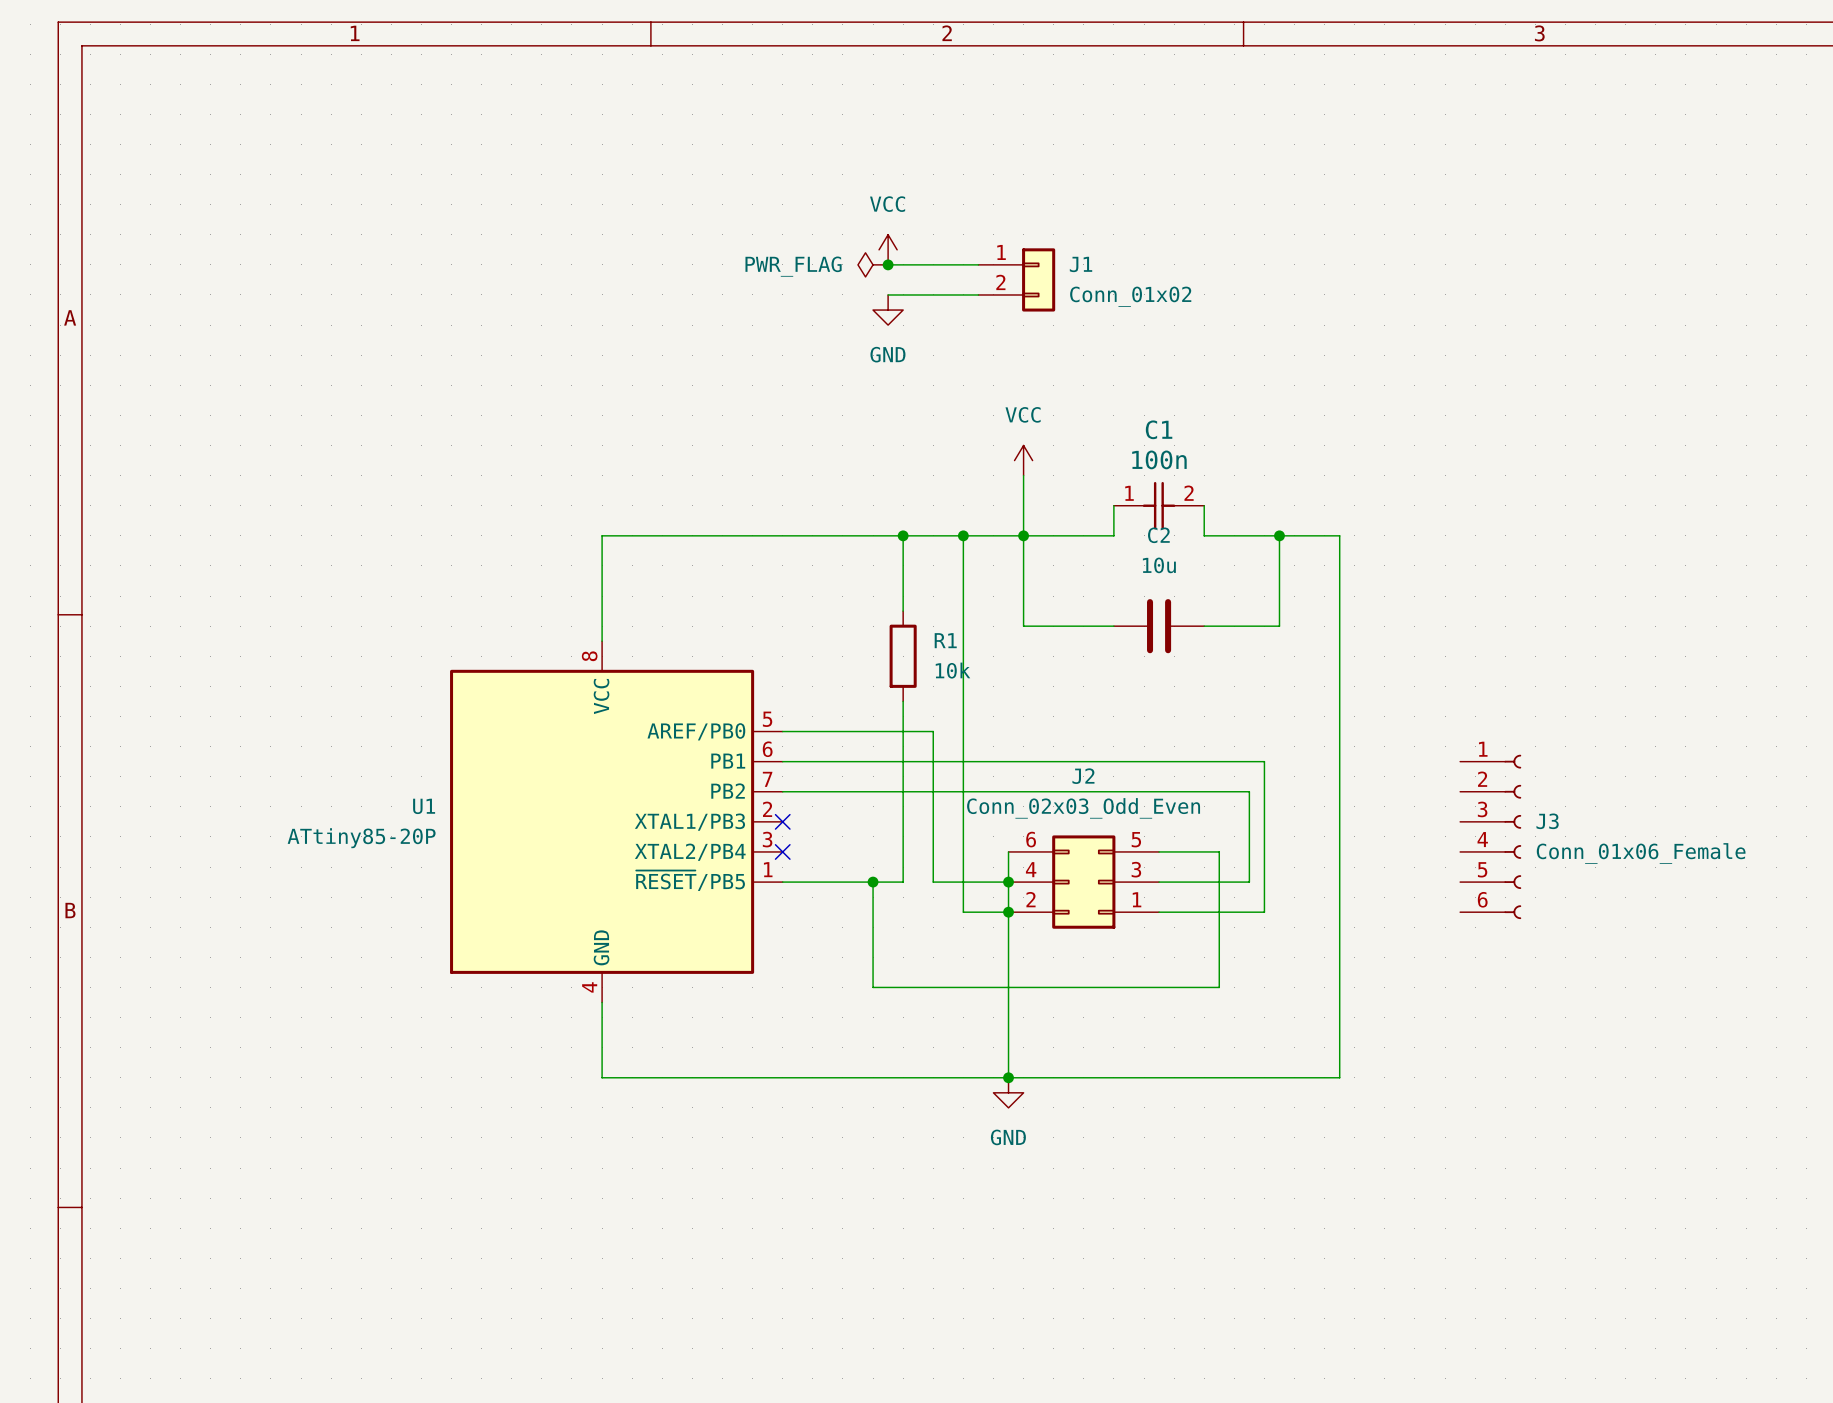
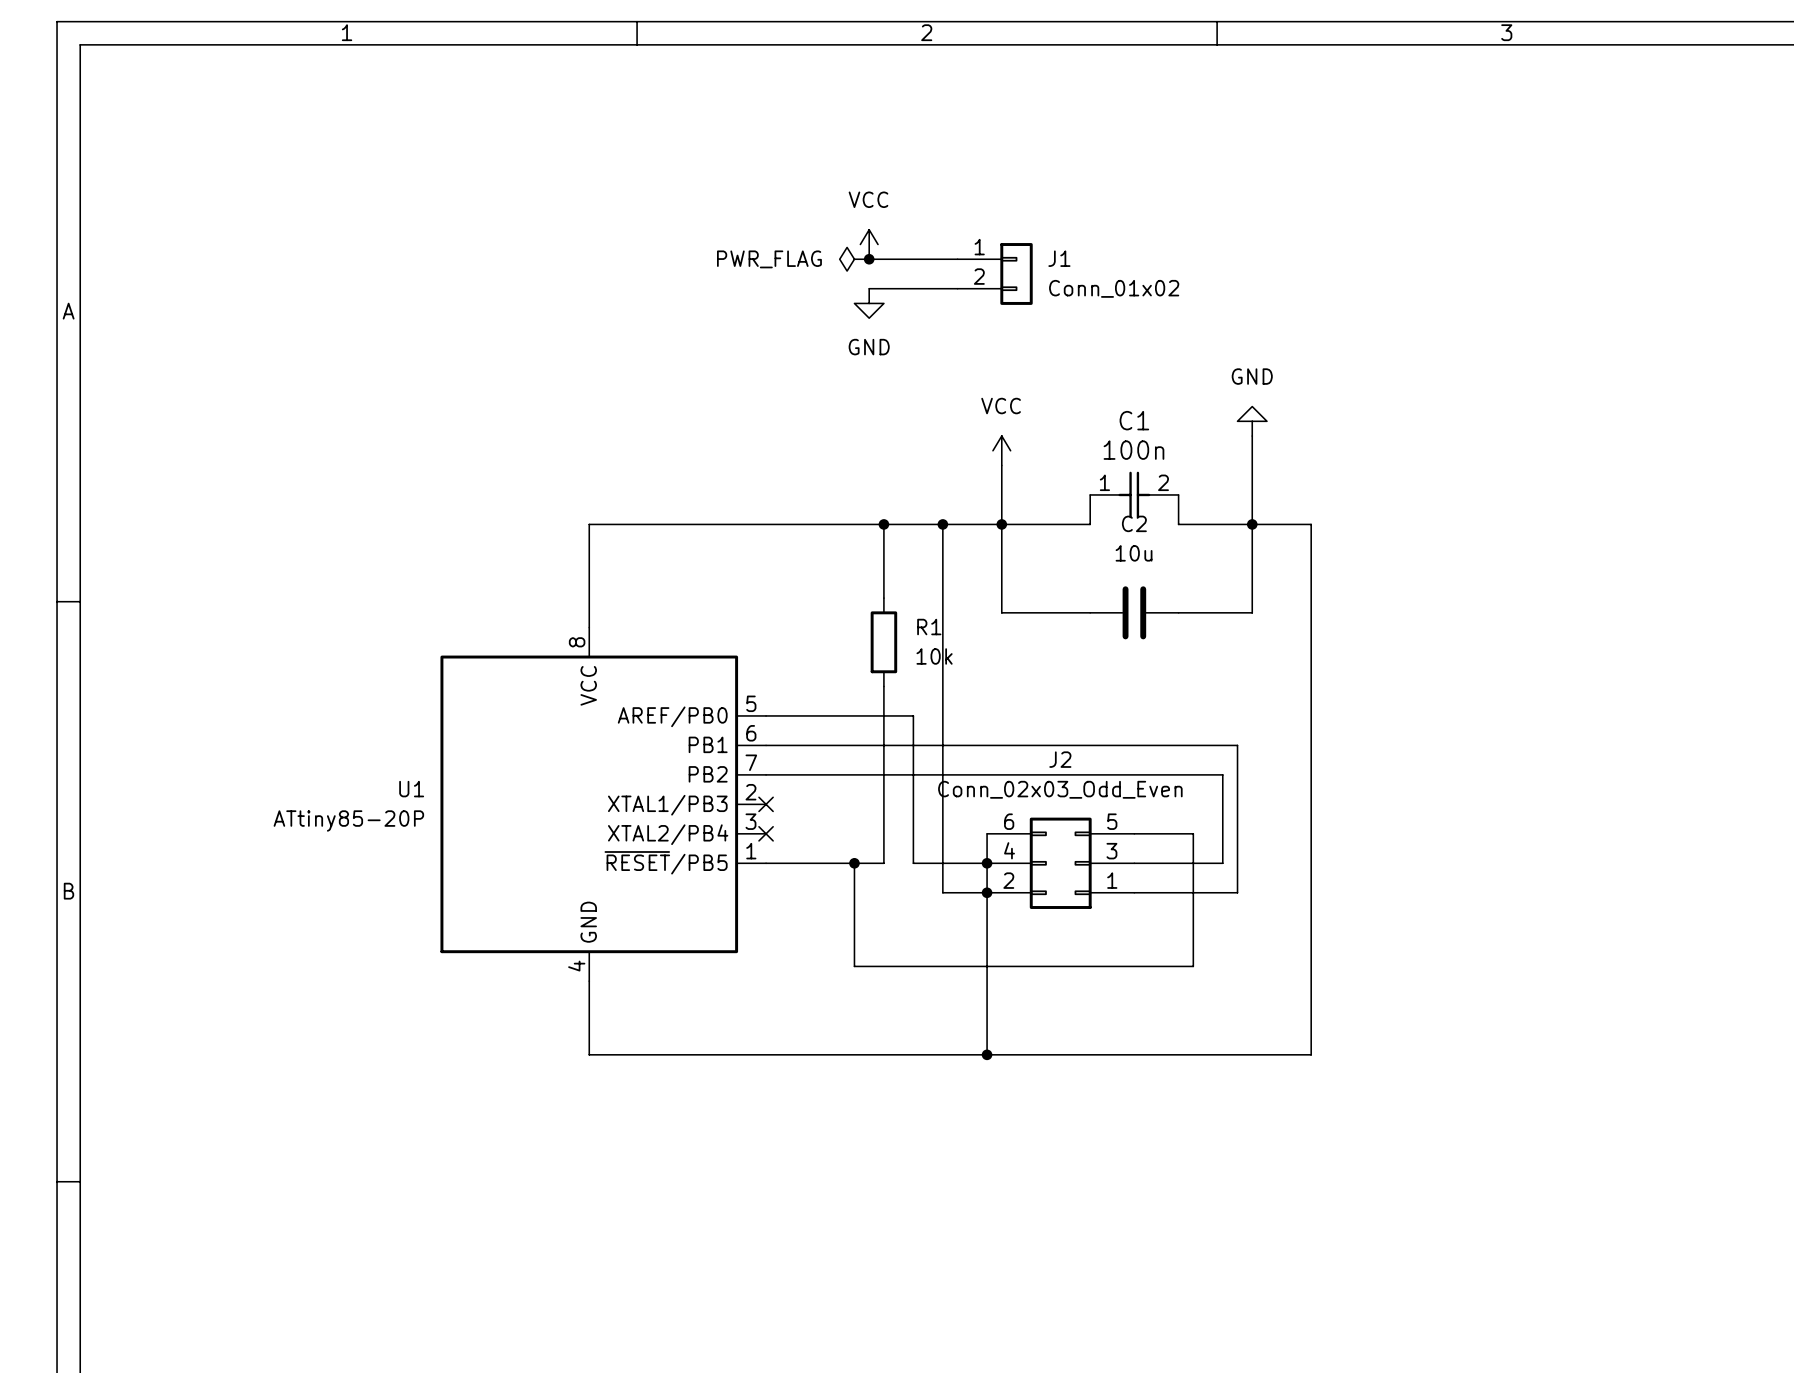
power symbol: none -> GND (1252, 421)
wire: none -> (1252, 436) (1252, 524)
J3: Conn_01x06_Female (1490, 836) -> none
power symbol: GND (1008, 1092) -> none

